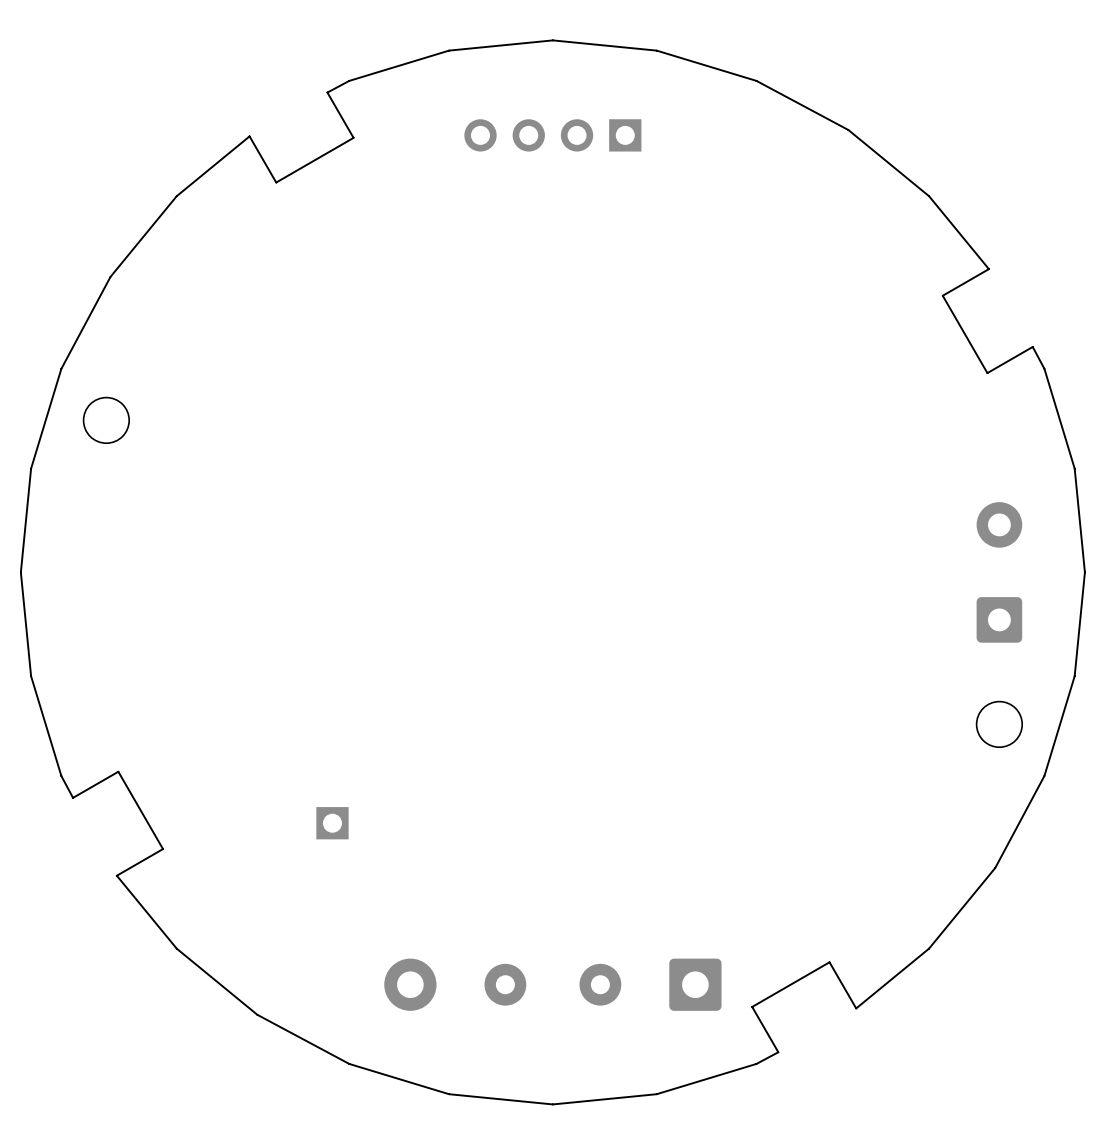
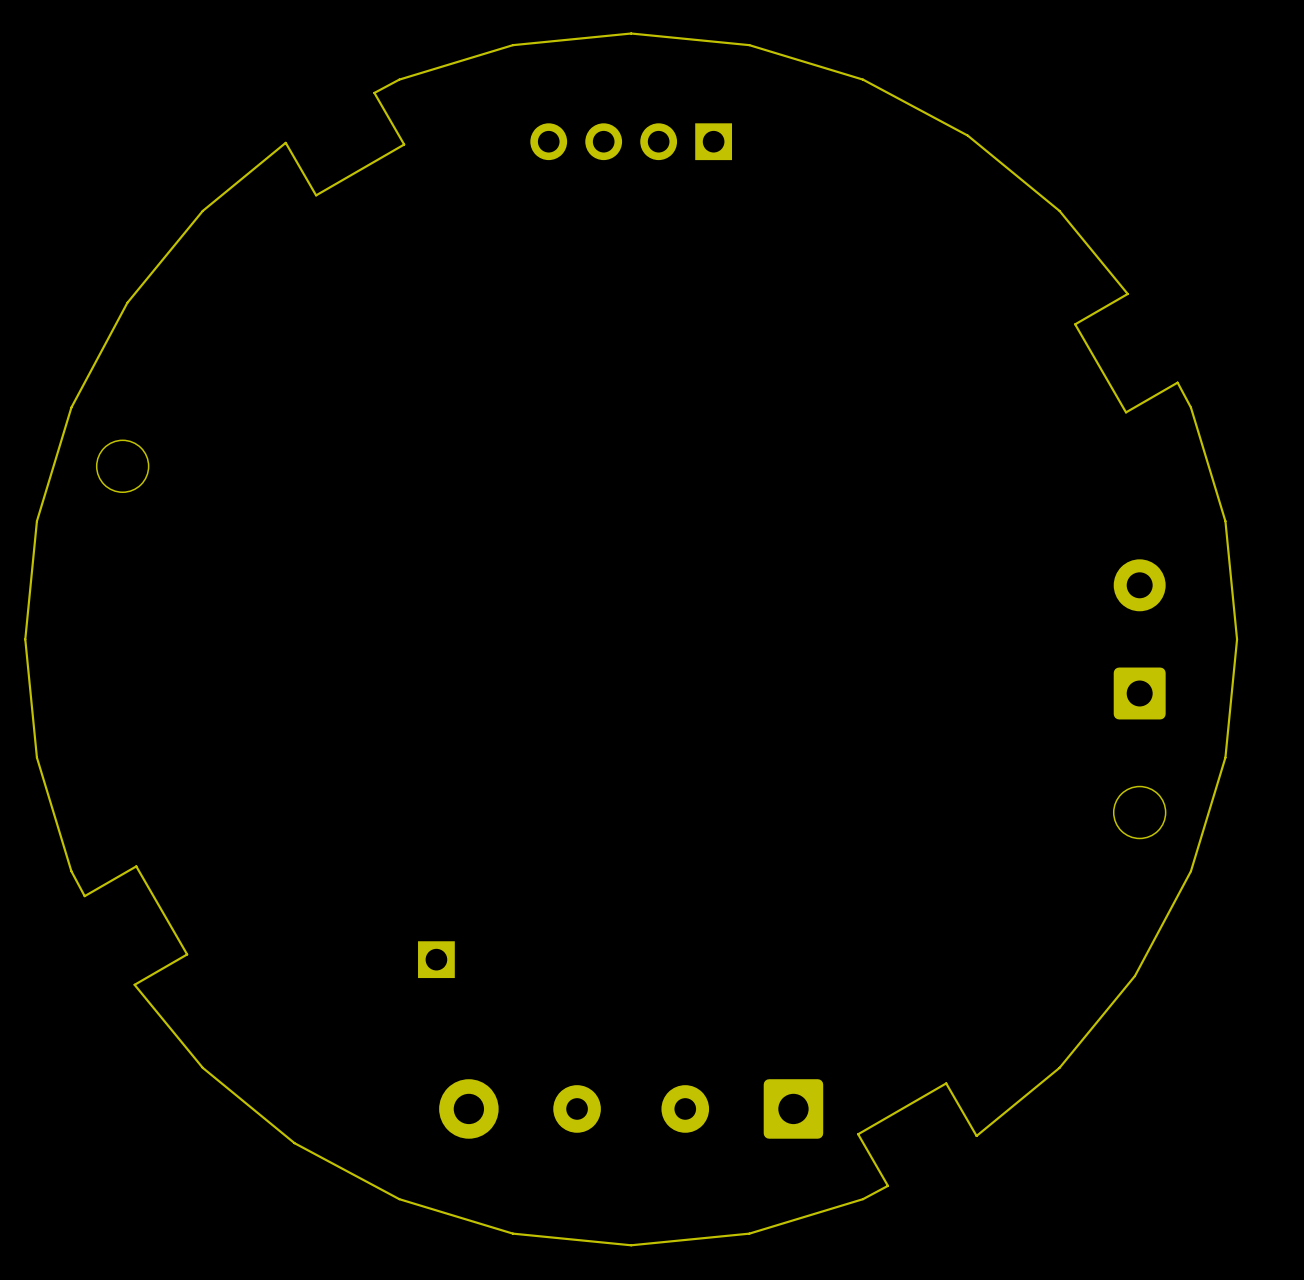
part position: (332, 823) -> (436, 959)

